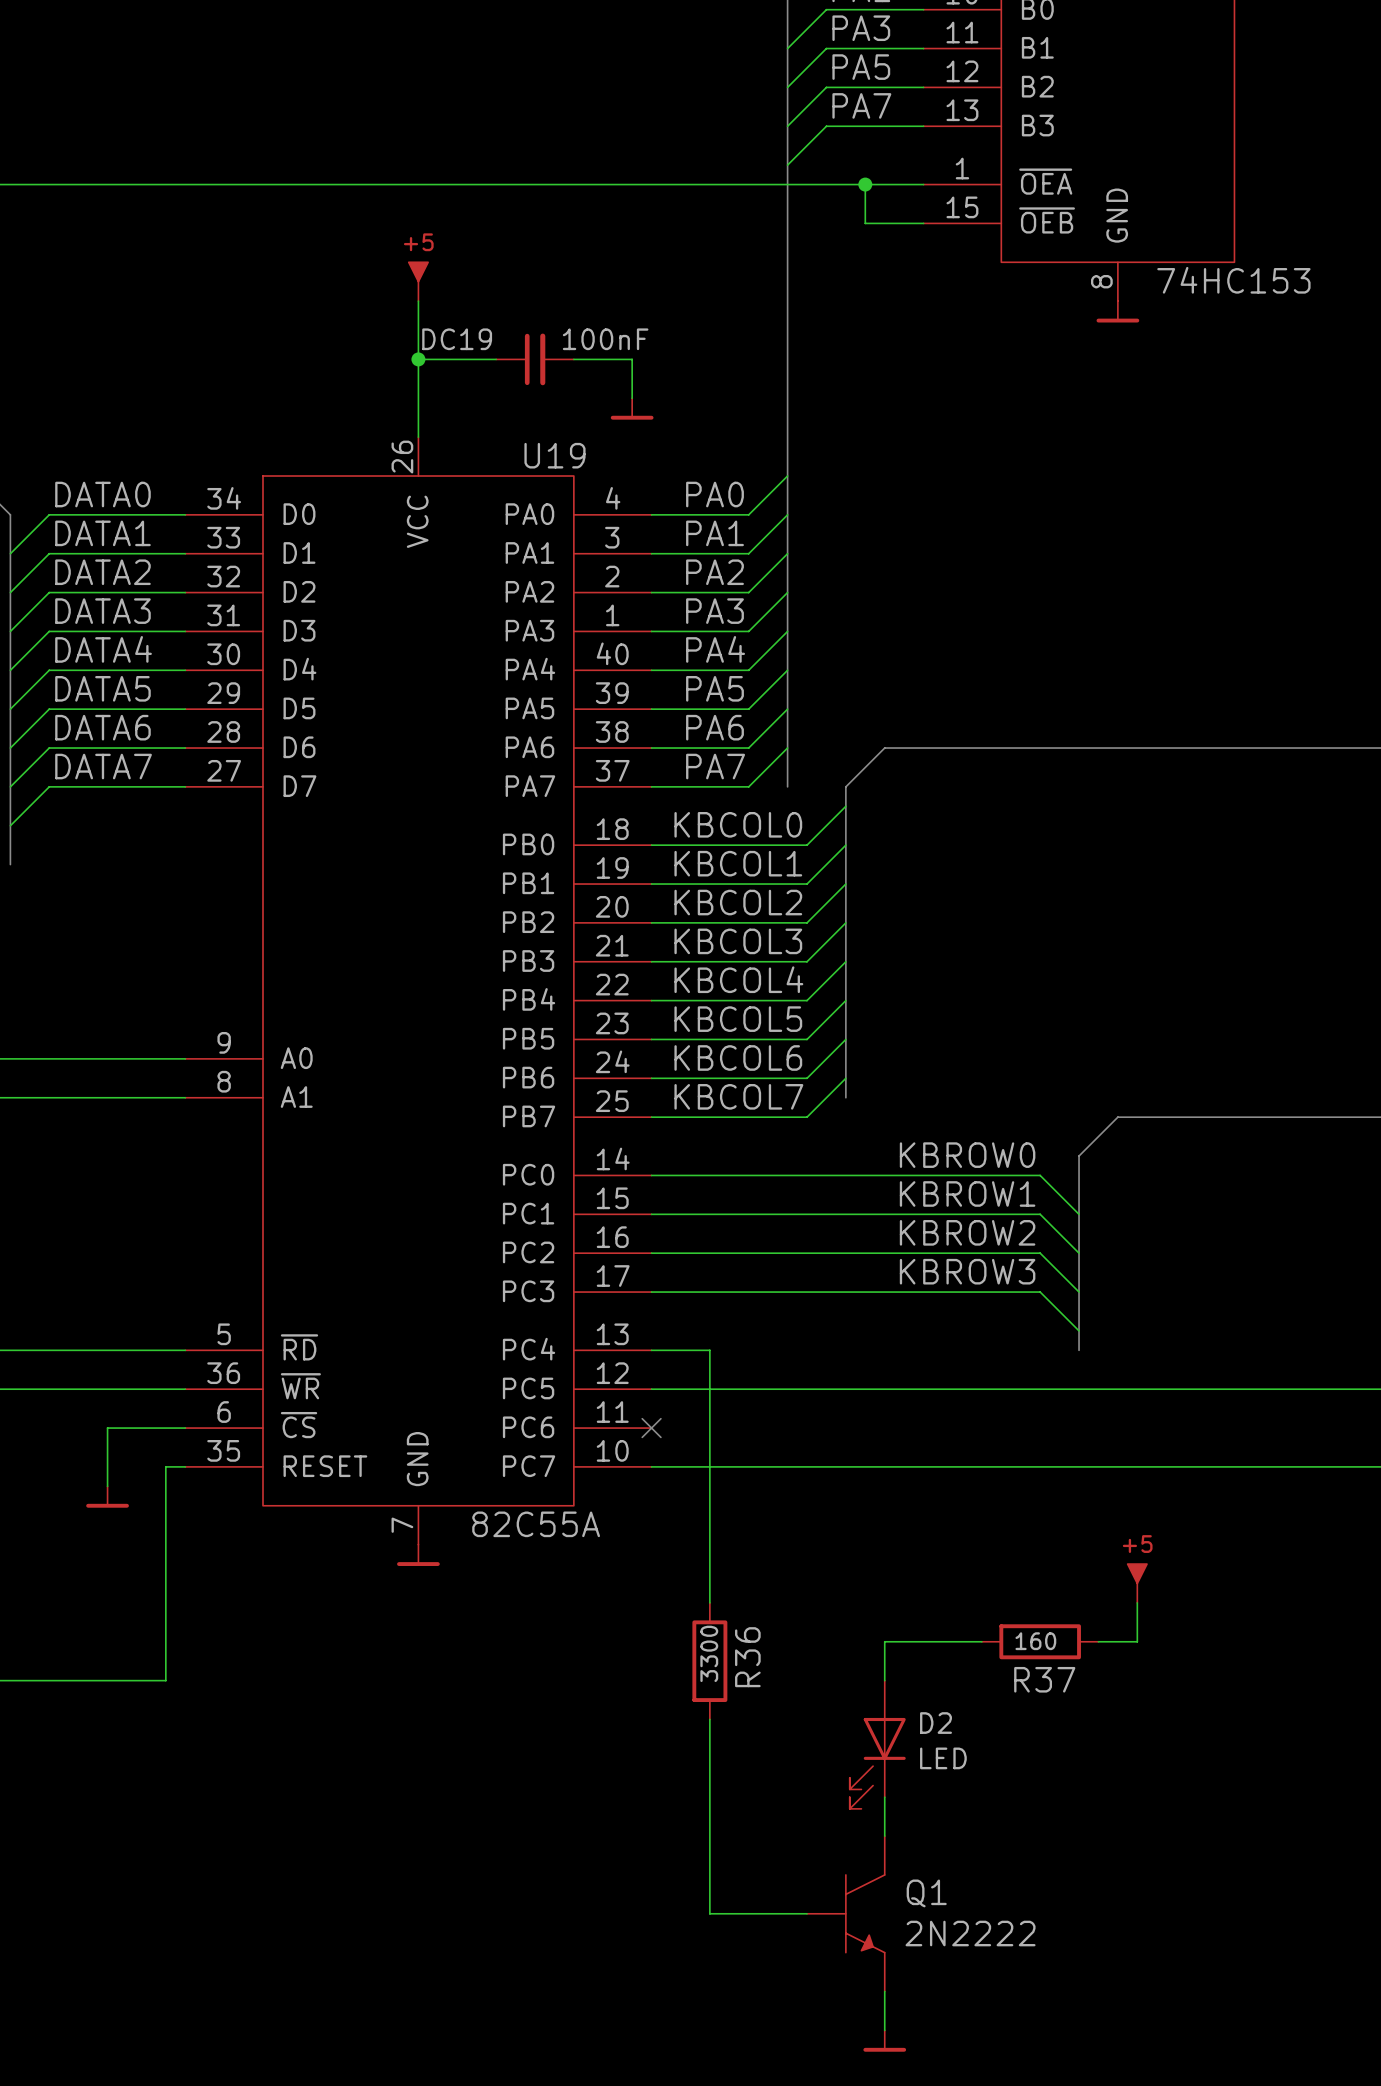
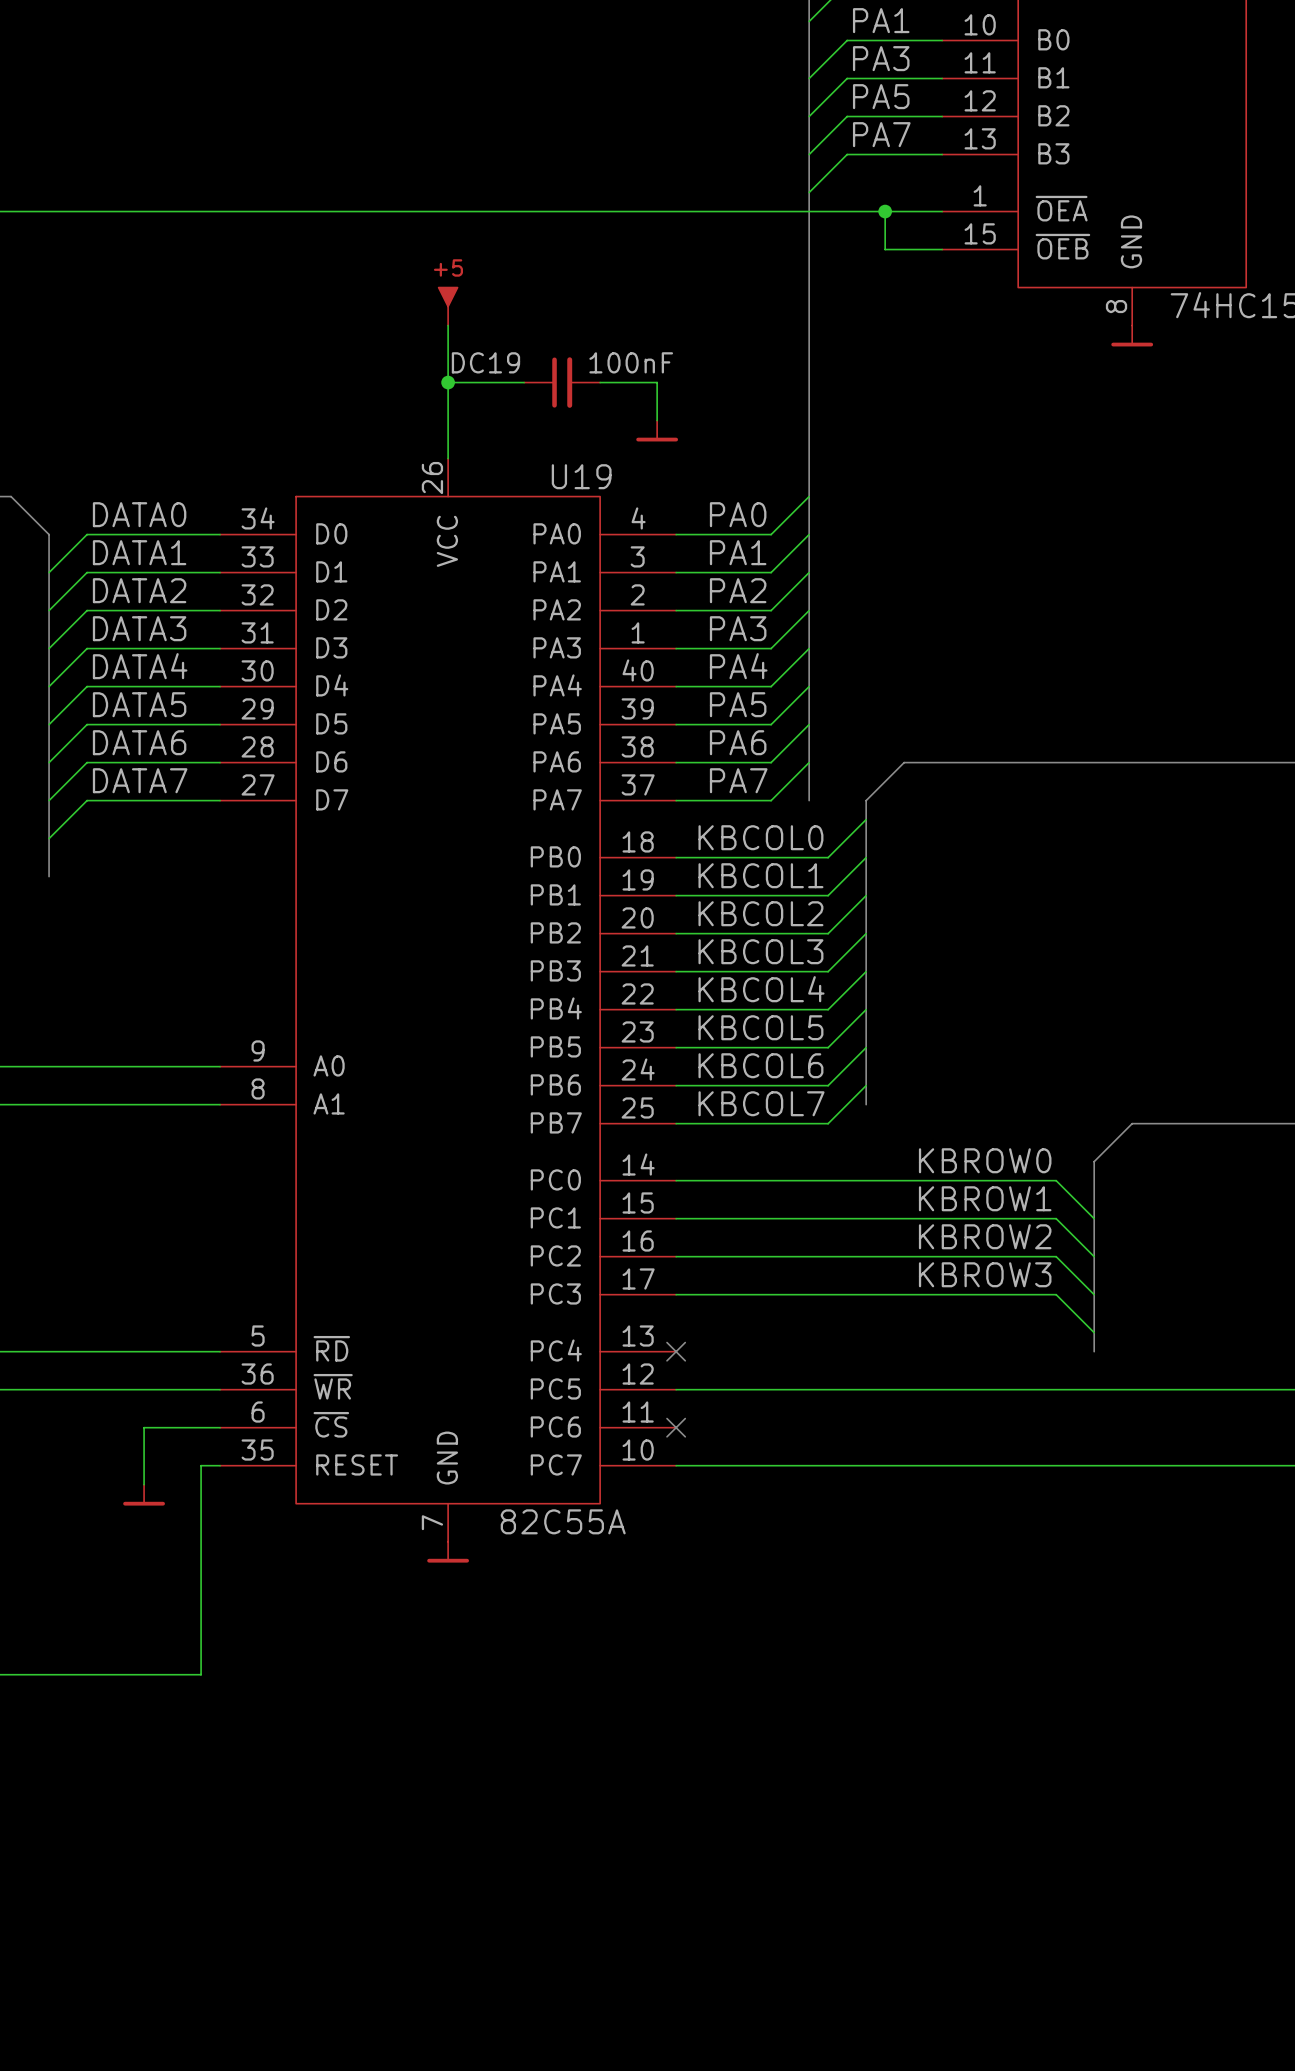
wire: (651, 1350) (709, 1350) (709, 1602) -> none
no-connect mark: none -> (676, 1351)
power symbol: (1137, 1583) -> none
wire: (1137, 1602) (1137, 1641) (1098, 1641) -> none
wire: (981, 1641) (884, 1641) (884, 1680) -> none
R37: 160 (1040, 1641) -> none
R36: 3300 (709, 1661) -> none
wire: (709, 1719) (709, 1913) (807, 1913) -> none
D2: LED (877, 1744) -> none
wire: (884, 1797) (884, 1836) -> none
Q1: 2N2222 (845, 1913) -> none
wire: (884, 1991) (884, 2030) -> none
power symbol: (884, 2041) -> none

